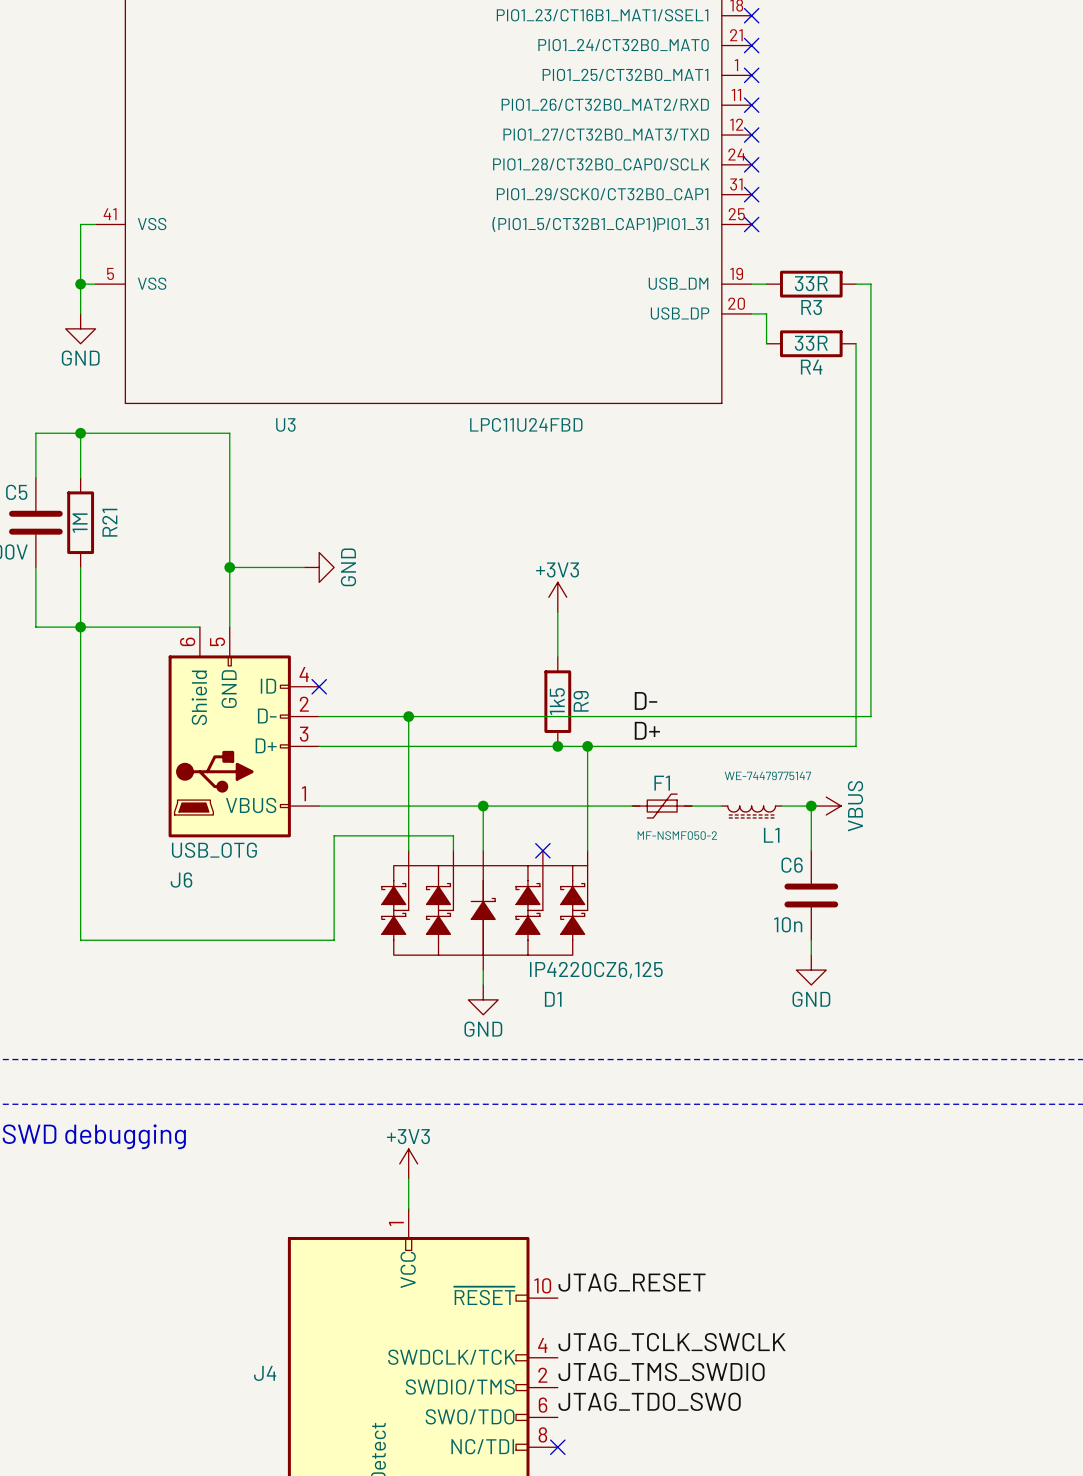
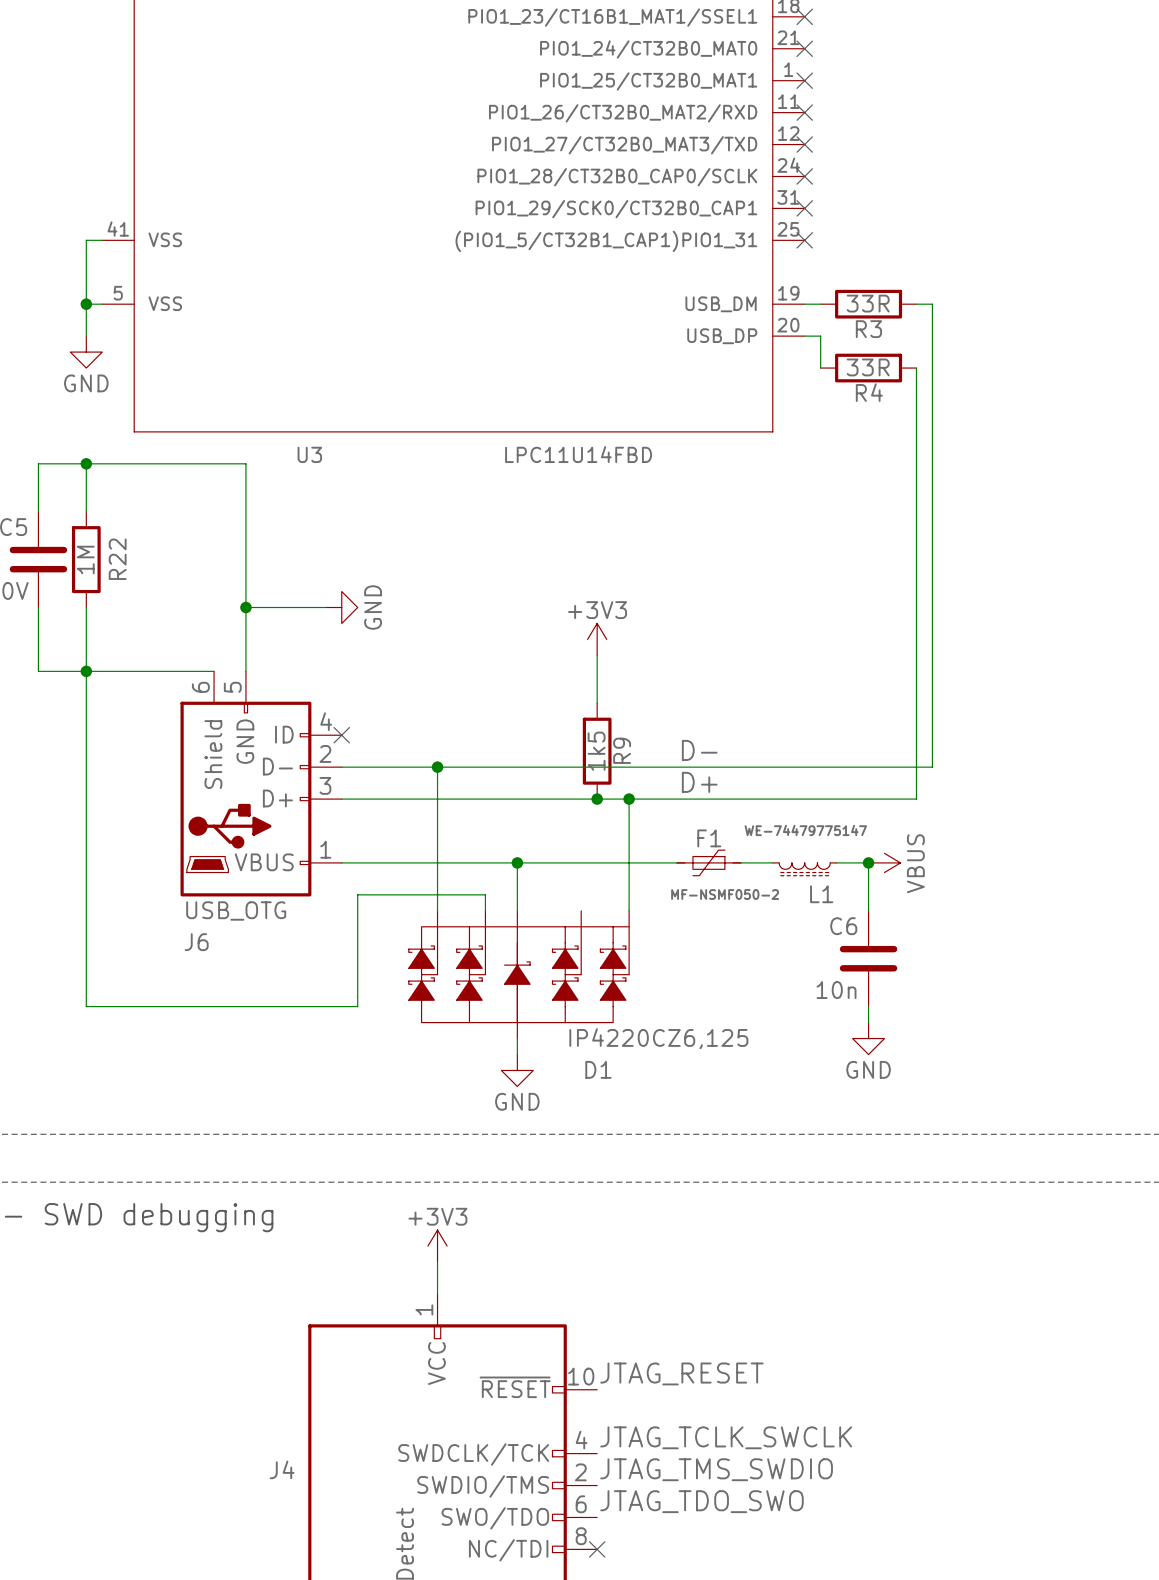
U3 value: LPC11U24FBD (526, 424) -> LPC11U14FBD (578, 454)
R21 name: R21 (109, 522) -> R22 (117, 559)
no-connect mark: (542, 850) -> none

